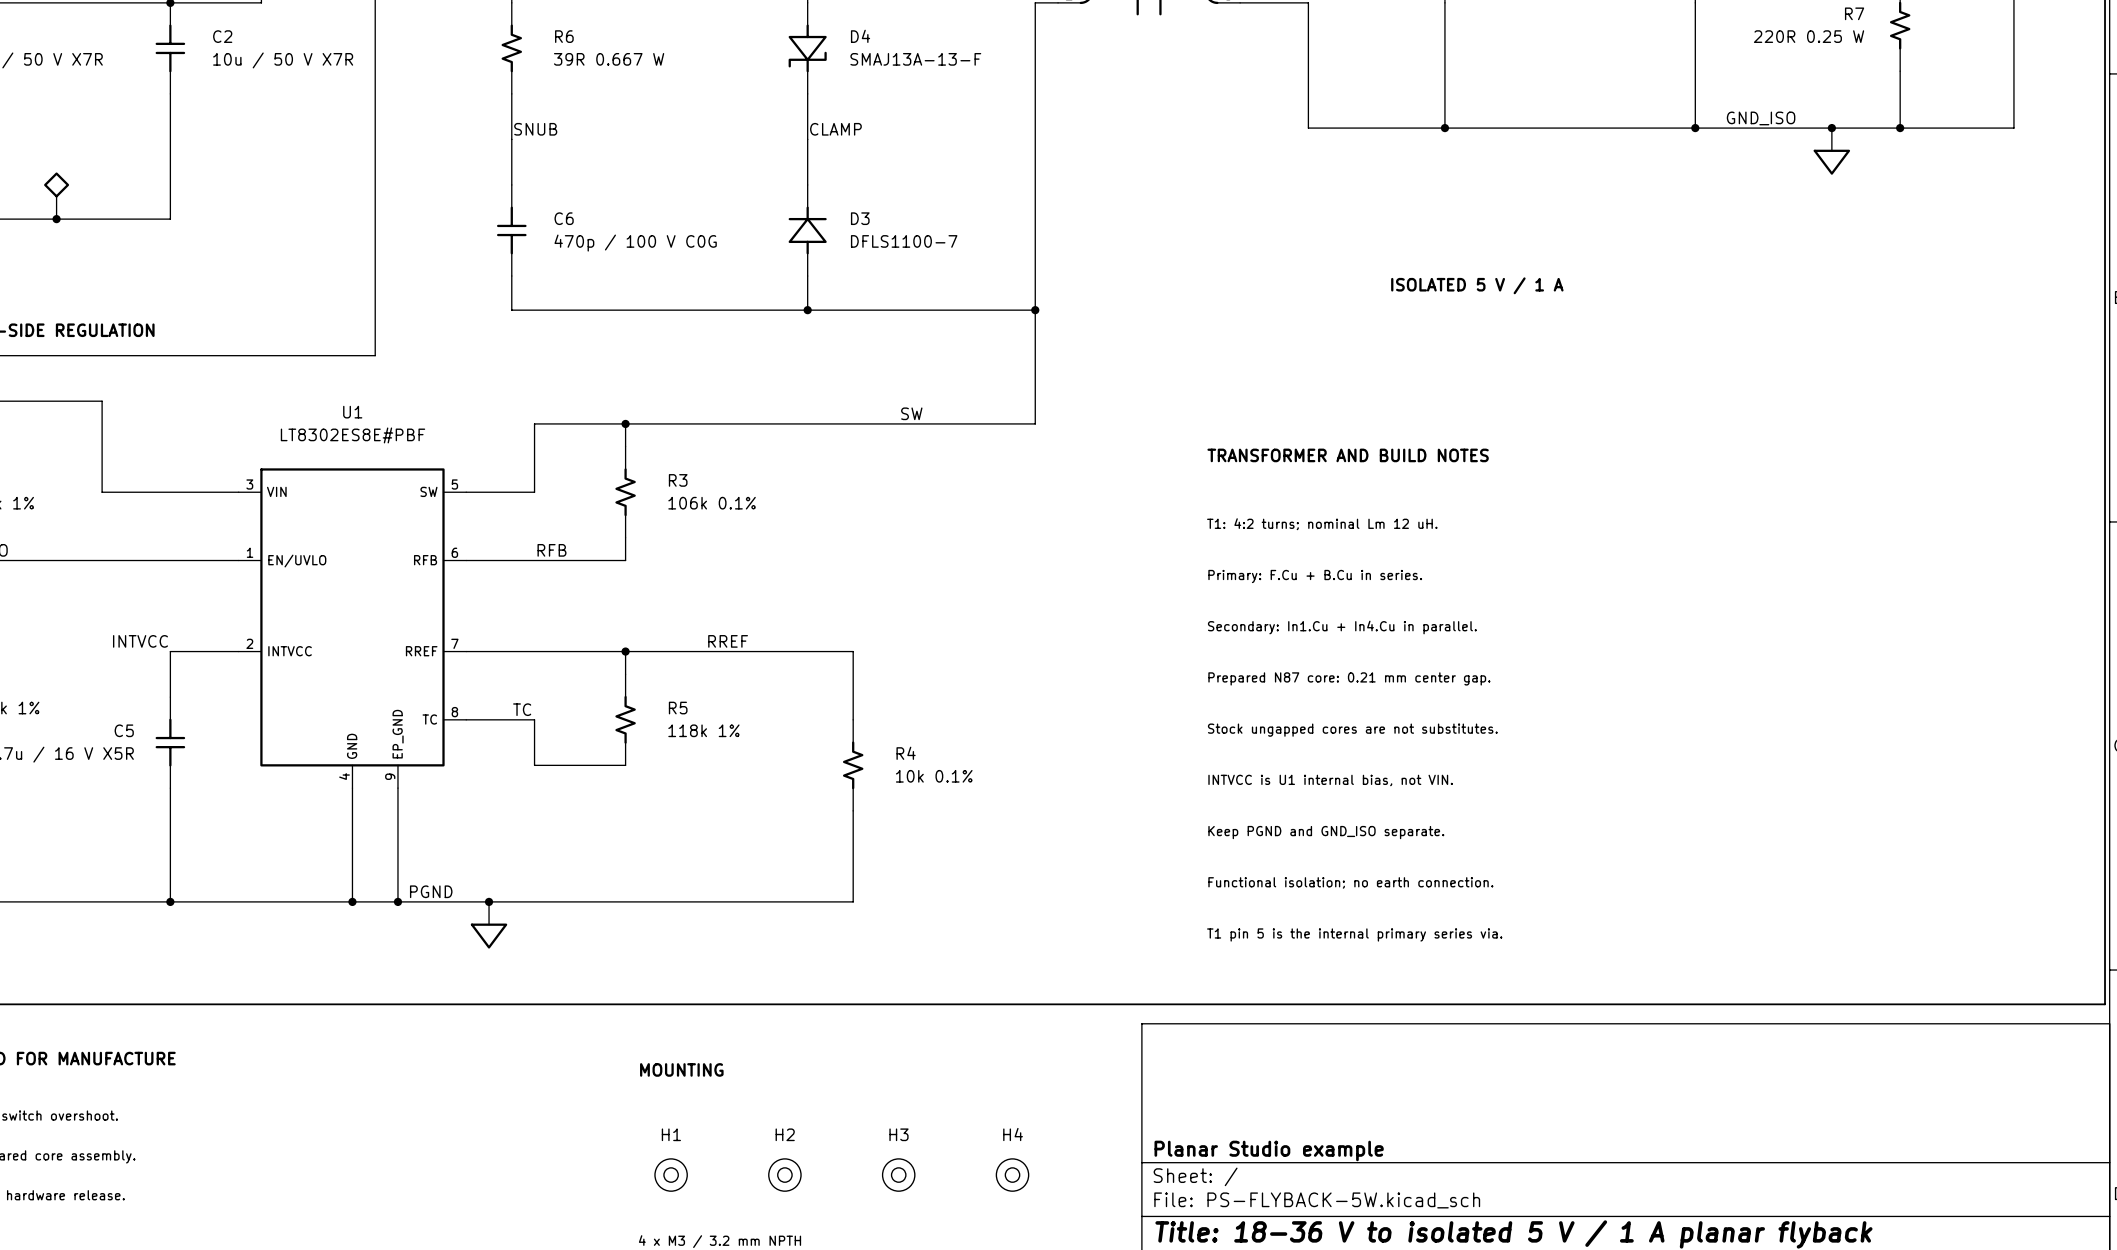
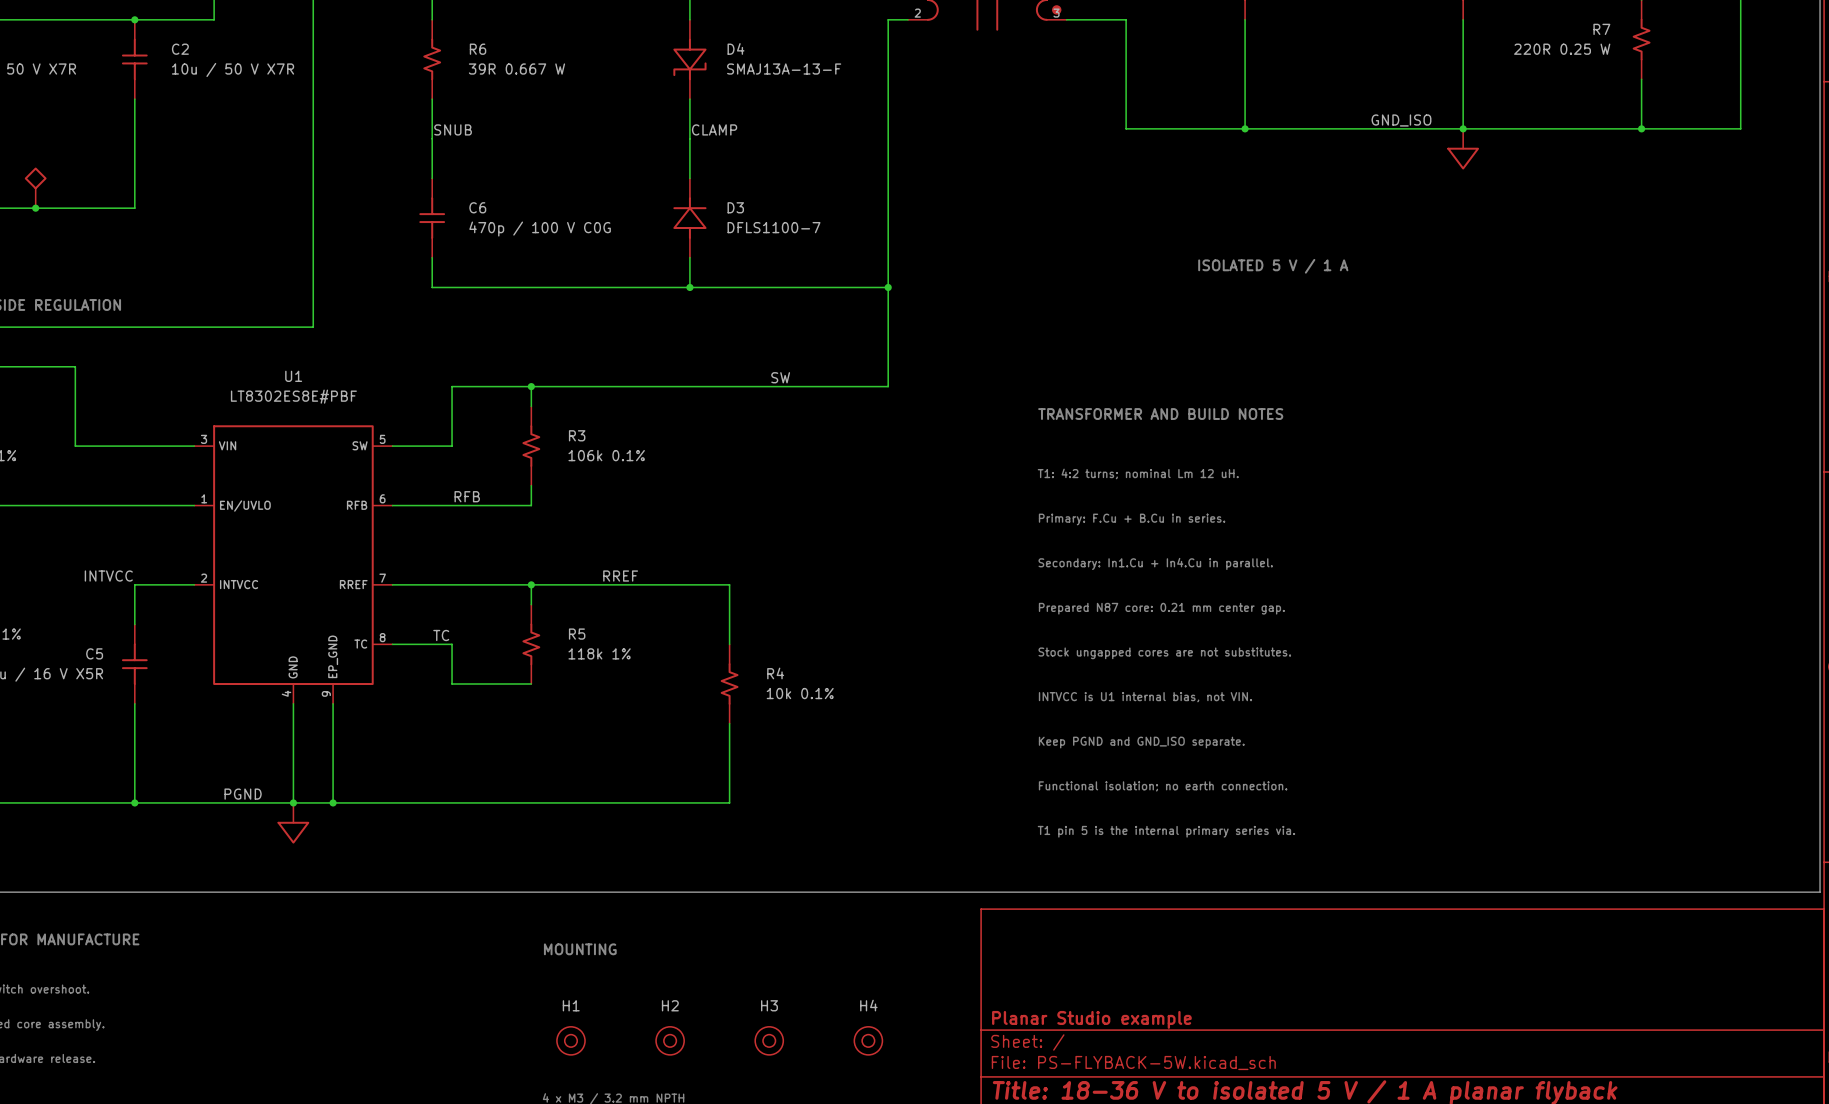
label position: GND_ISO (1761, 118) -> GND_ISO (1401, 120)
junction: (1831, 128) -> none
power symbol position: (1831, 151) -> (1463, 149)
label position: PGND (431, 891) -> PGND (243, 794)
junction: (489, 901) -> none
power symbol position: (489, 925) -> (293, 823)

